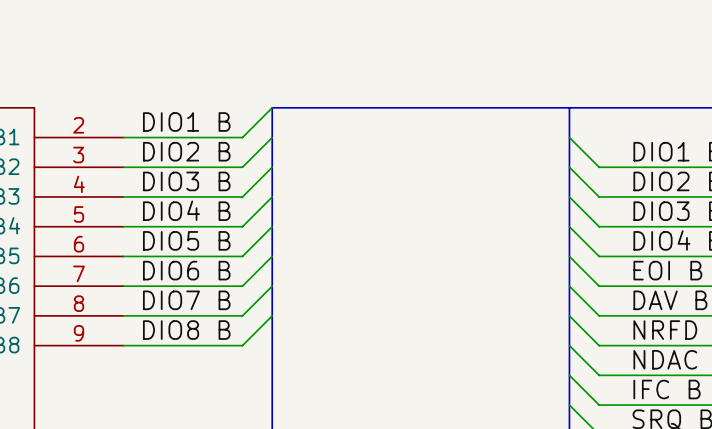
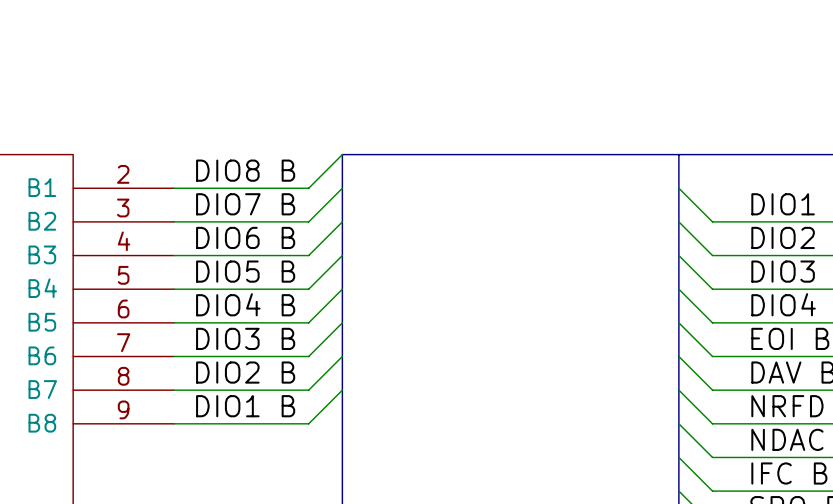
label: DIO1 B (186, 121) -> DIO8 B (245, 170)
label: DIO2 B (186, 151) -> DIO7 B (245, 204)
label: DIO3 B (186, 181) -> DIO6 B (245, 237)
label: DIO4 B (186, 210) -> DIO5 B (245, 271)
label: DIO5 B (186, 240) -> DIO4 B (245, 304)
label: DIO6 B (186, 270) -> DIO3 B (245, 338)
label: DIO7 B (186, 300) -> DIO2 B (245, 372)
label: DIO8 B (186, 330) -> DIO1 B (245, 406)

